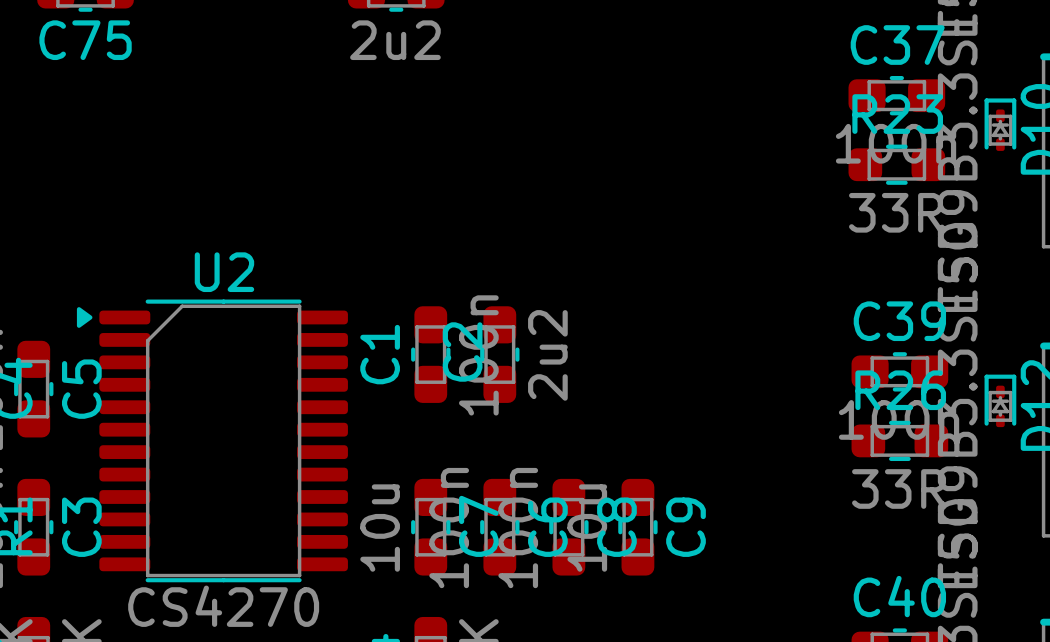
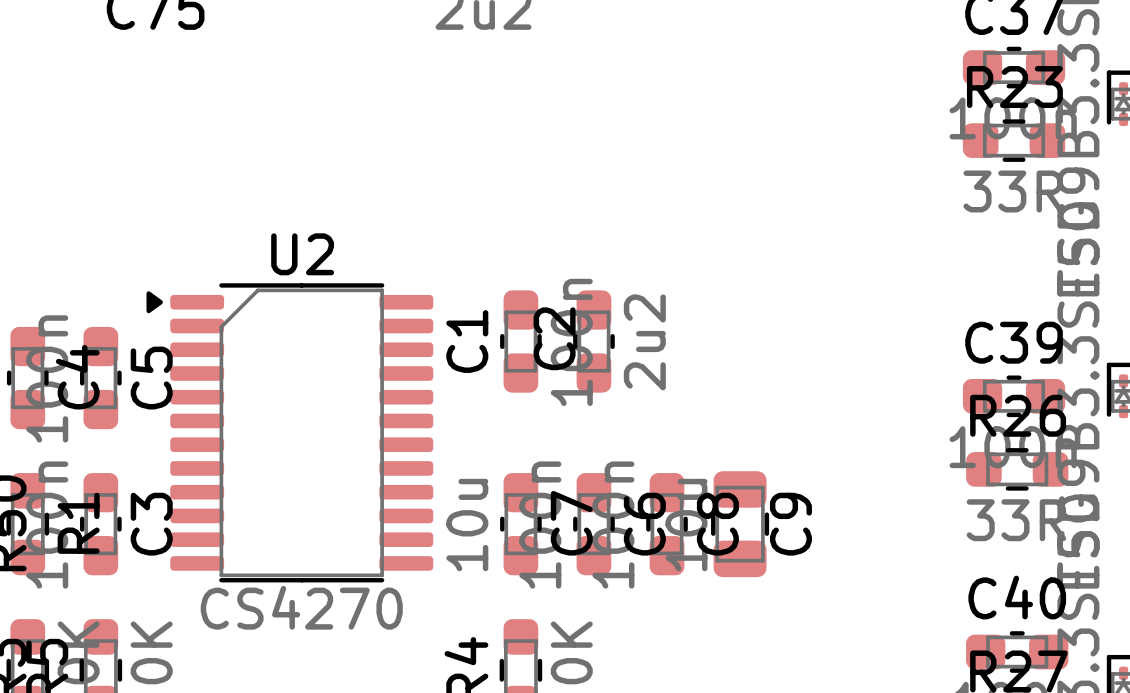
C39 position: (899, 371) -> (1014, 396)
R26 position: (899, 440) -> (1017, 469)
C9 footprint: [618, 478, 658, 576] -> [711, 471, 770, 578]

